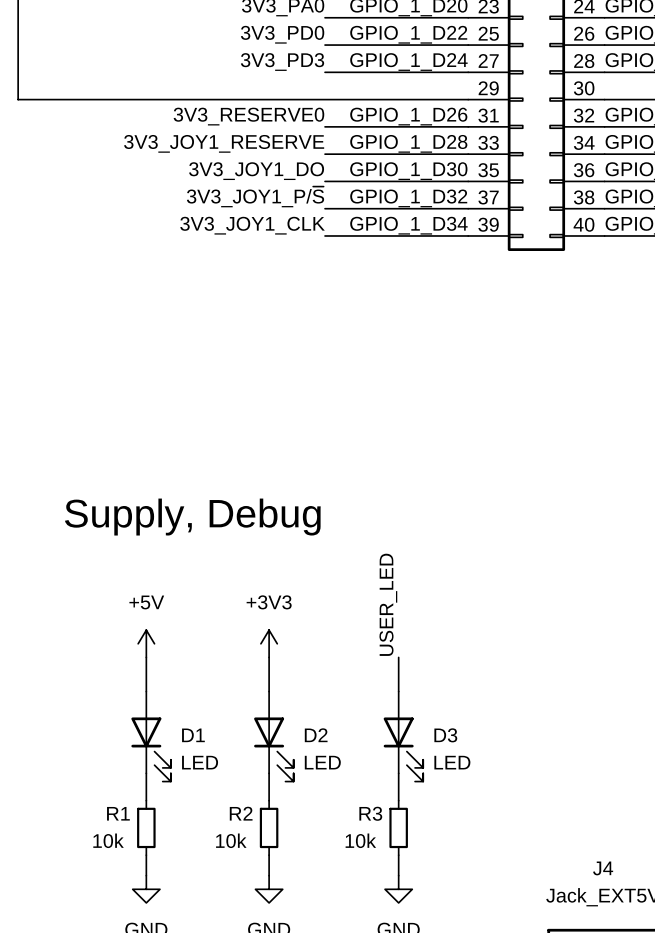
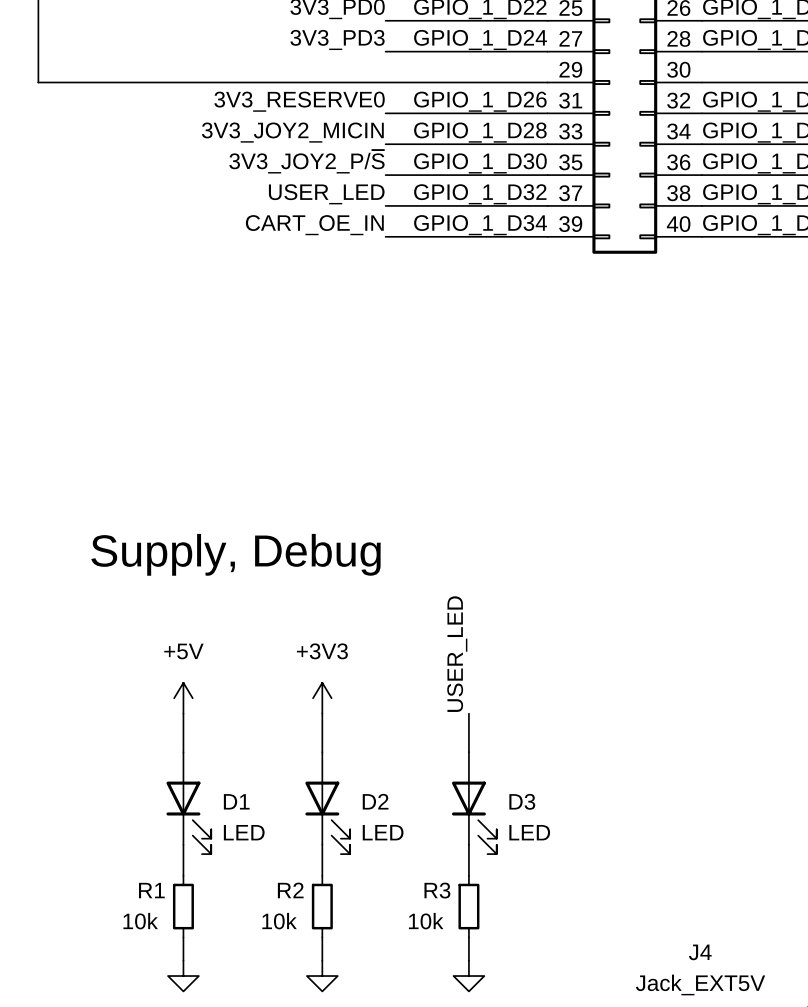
label: 3V3_JOY1_RESERVE (224, 143) -> 3V3_JOY2_MICIN (292, 132)
label: 3V3_JOY1_DO (256, 171) -> 3V3_JOY2_P/~{S} (306, 161)
label: 3V3_JOY1_P/~{S} (255, 196) -> USER_LED (326, 194)
label: 3V3_JOY1_CLK (252, 225) -> CART_OE_IN (314, 225)

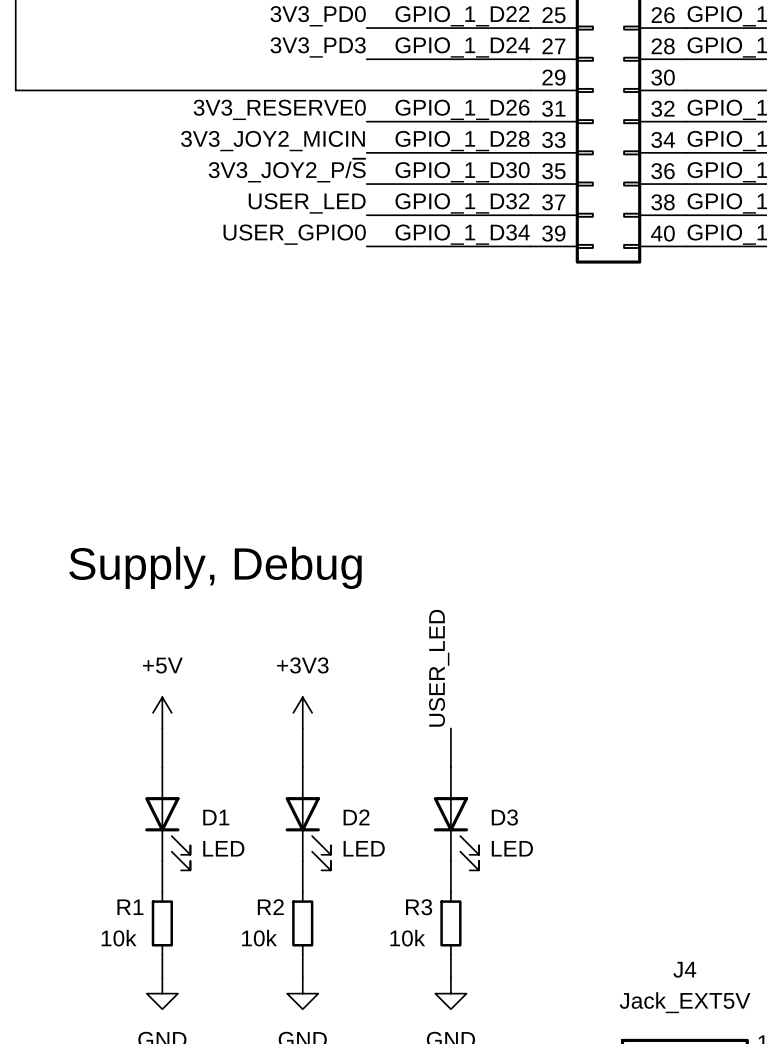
label: CART_OE_IN (314, 225) -> USER_GPIO0 (294, 234)

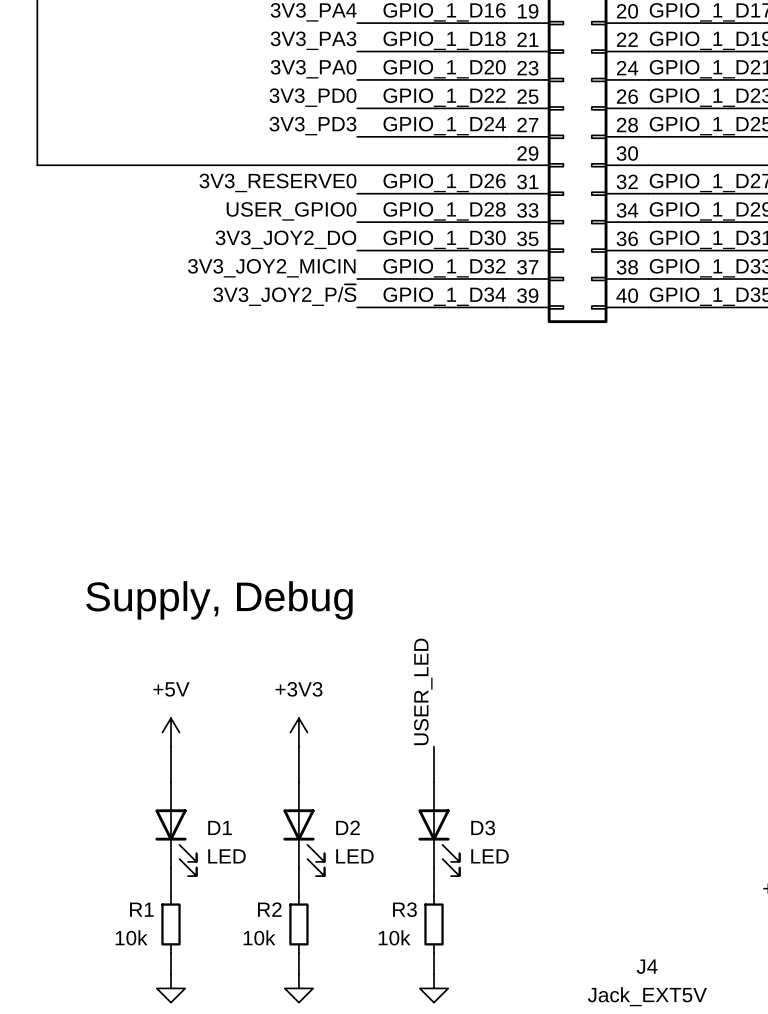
label: 3V3_JOY2_MICIN (272, 141) -> USER_GPIO0 (291, 211)
label: 3V3_JOY2_P/~{S} (287, 170) -> 3V3_JOY2_DO (285, 239)
label: USER_LED (307, 203) -> 3V3_JOY2_MICIN (271, 268)
label: USER_GPIO0 (294, 234) -> 3V3_JOY2_P/~{S} (284, 295)

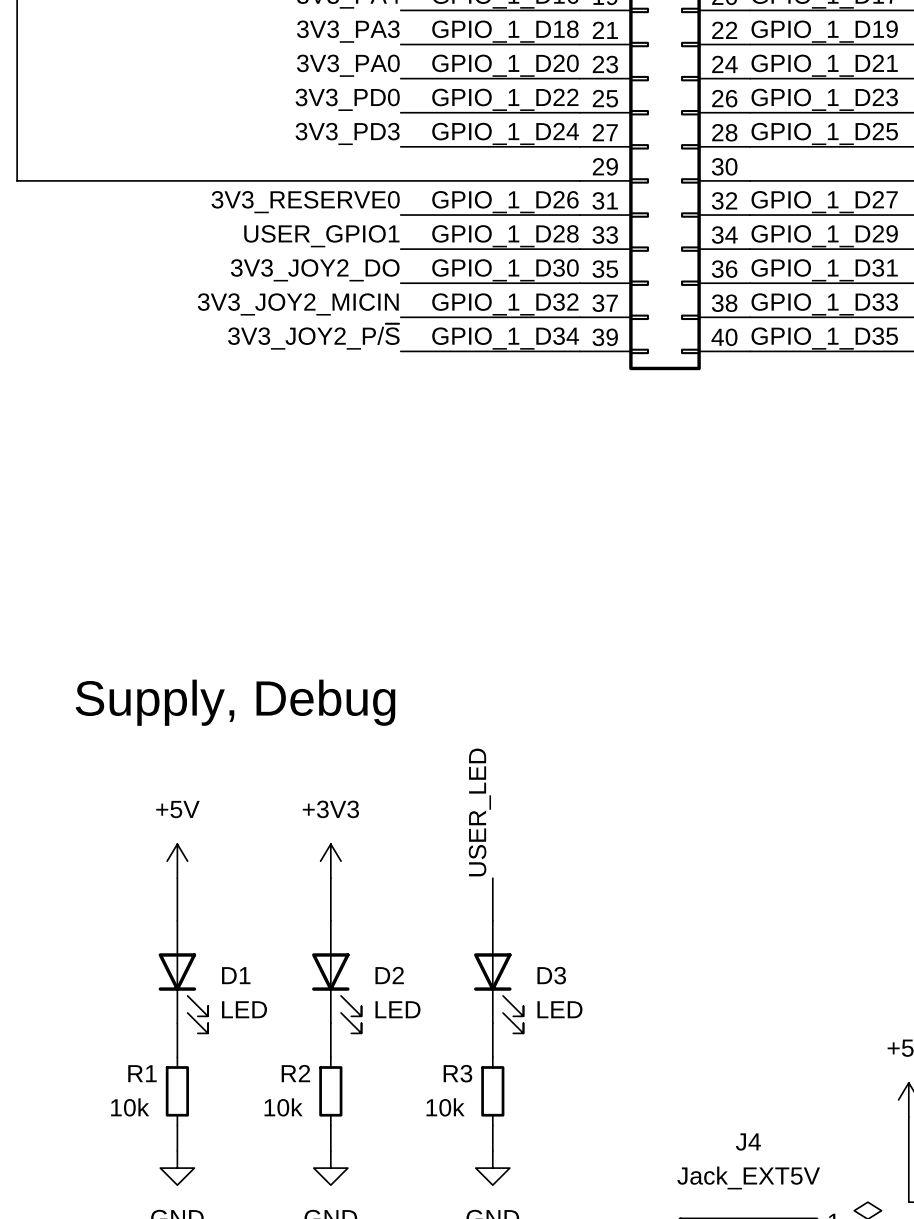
label: USER_GPIO0 (291, 211) -> USER_GPIO1 (321, 236)

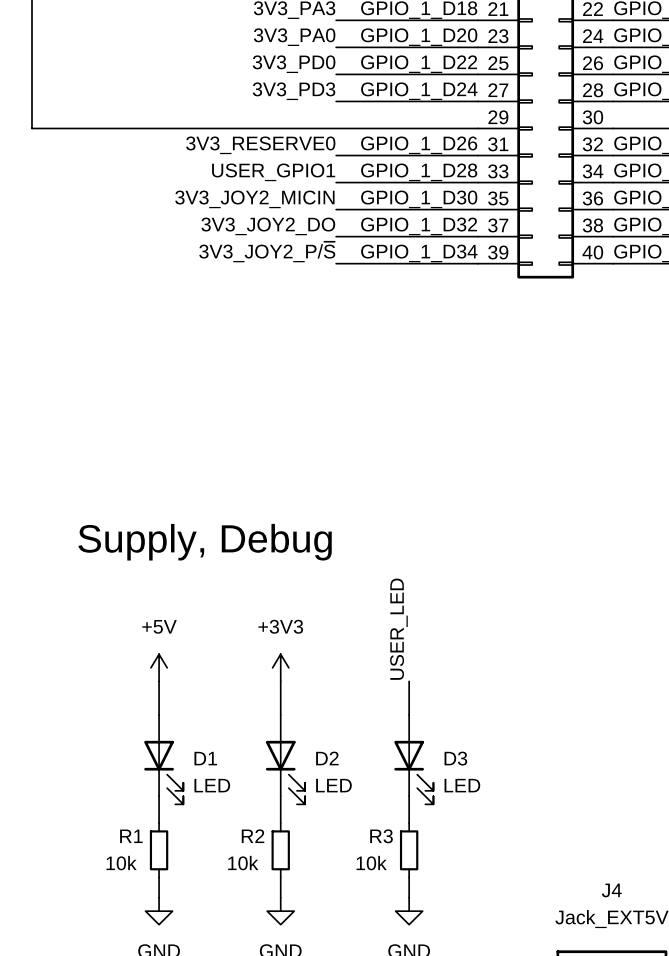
label: 3V3_JOY2_DO (315, 270) -> 3V3_JOY2_MICIN (254, 199)
label: 3V3_JOY2_MICIN (298, 304) -> 3V3_JOY2_DO (268, 226)

